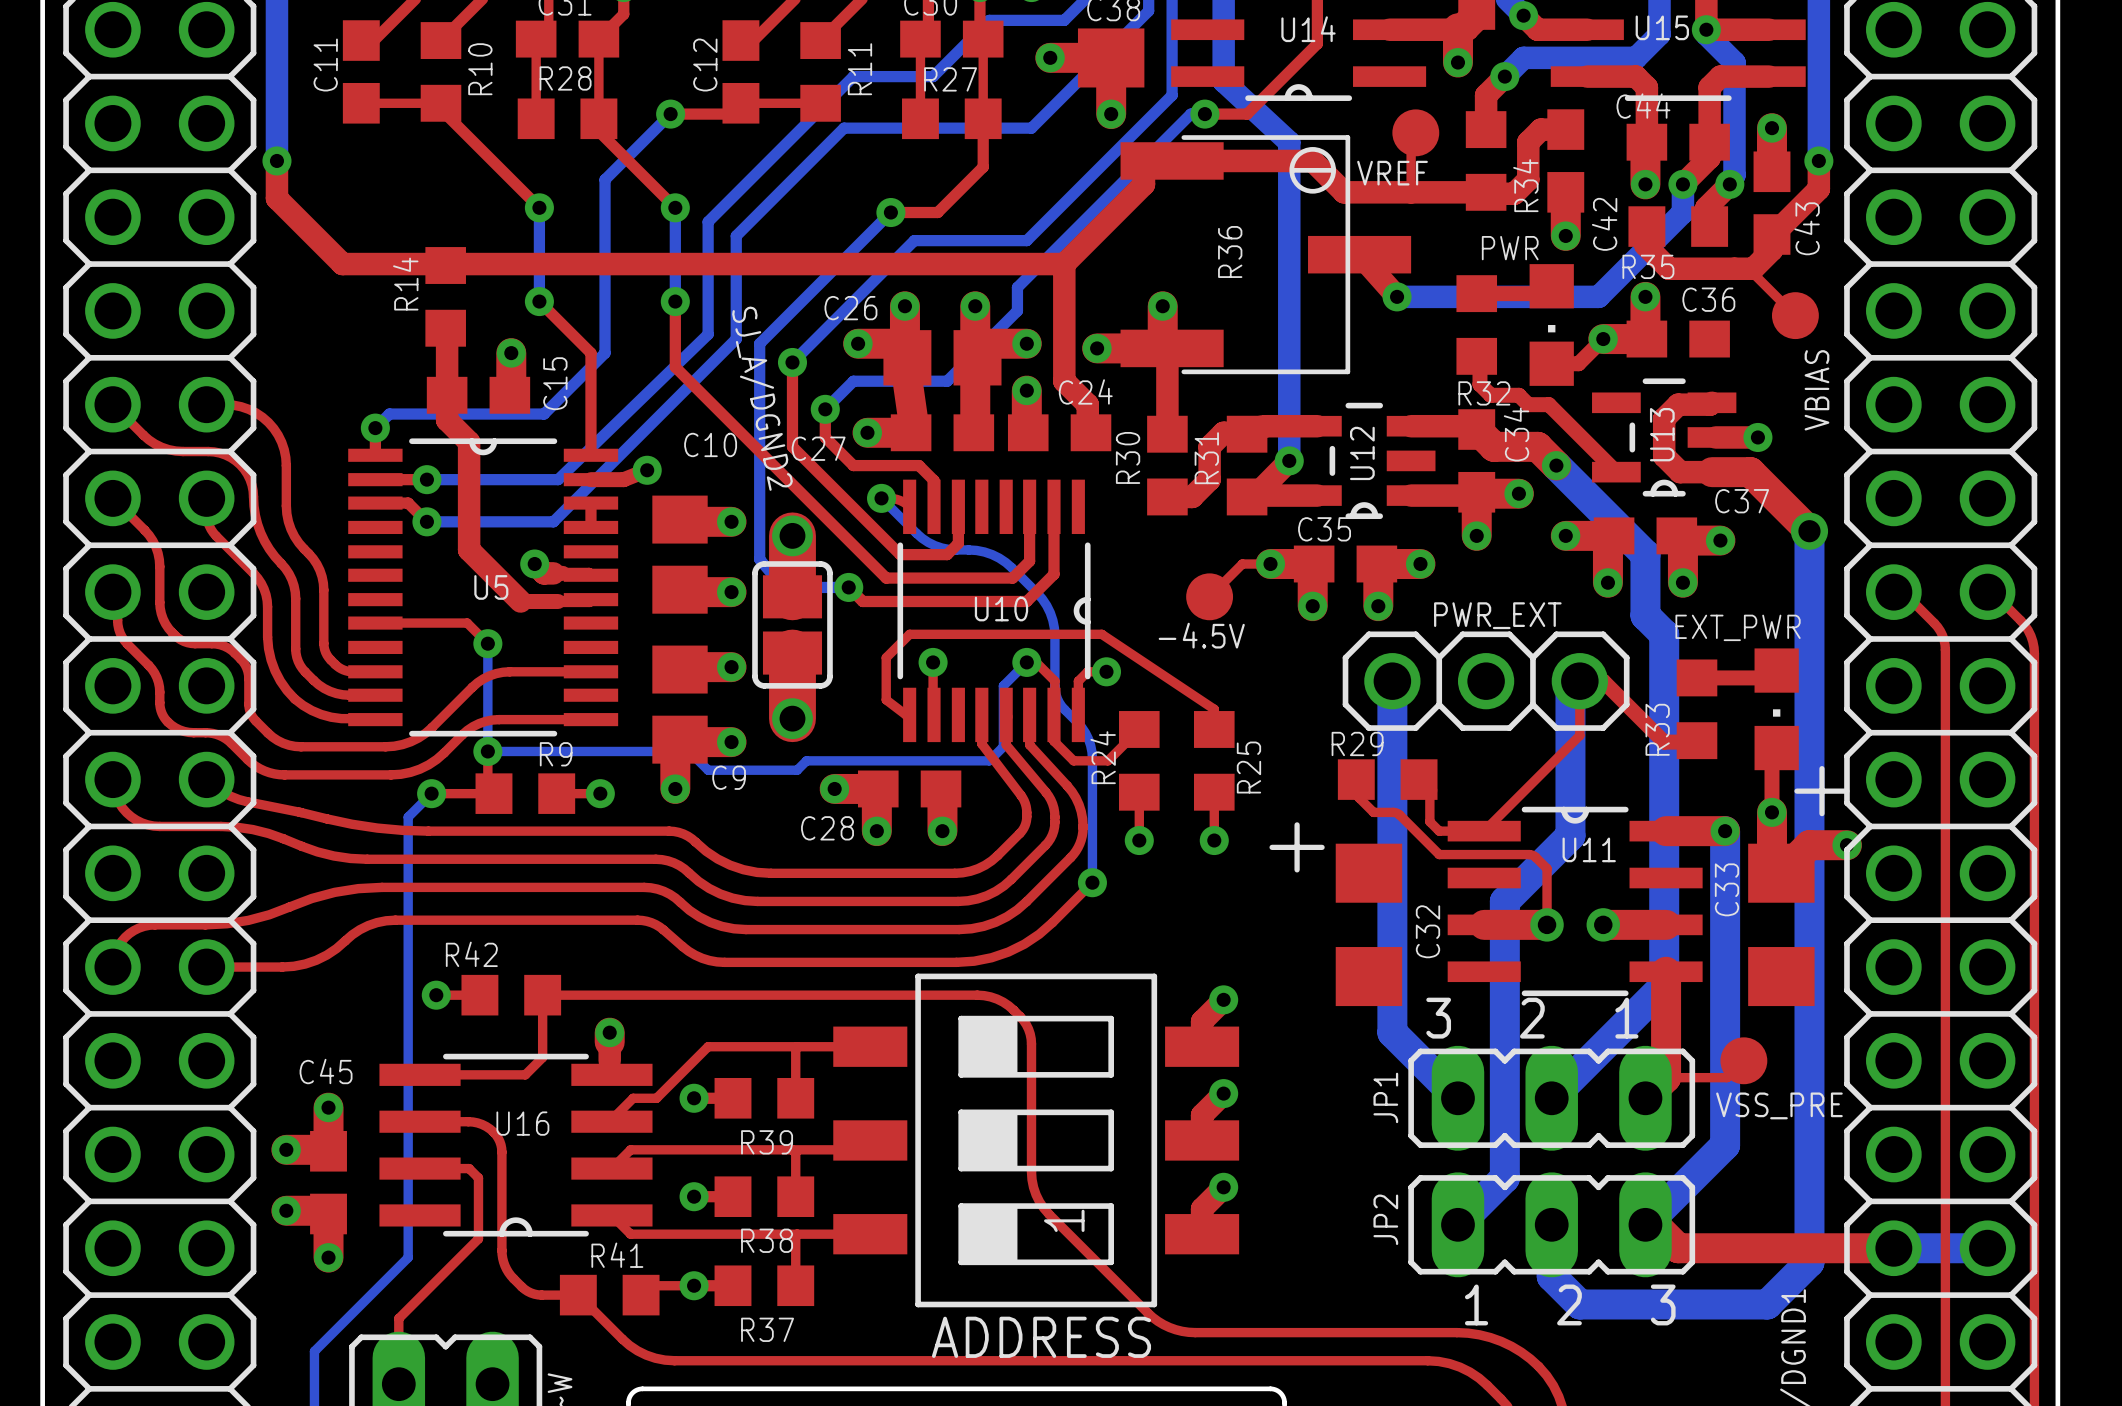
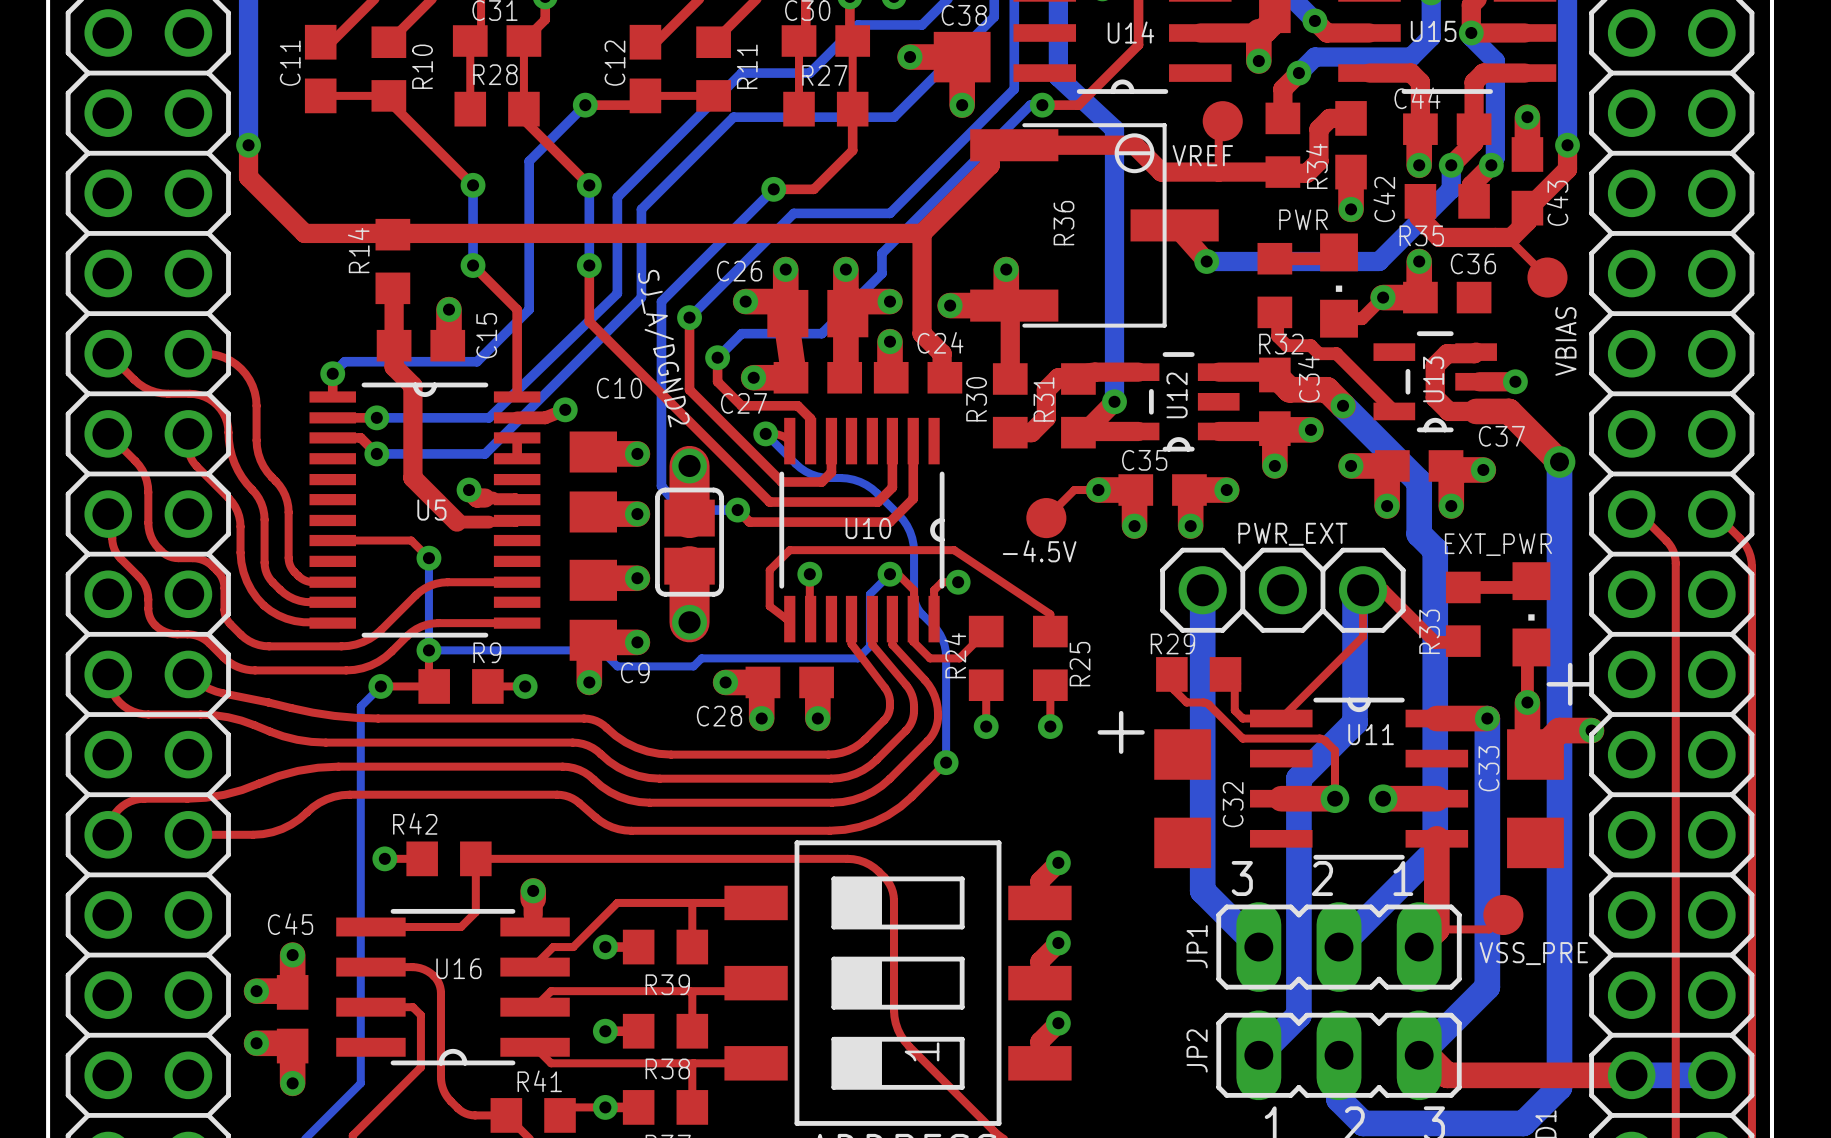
C27 name position: C27 (818, 448) -> C27 (743, 403)

